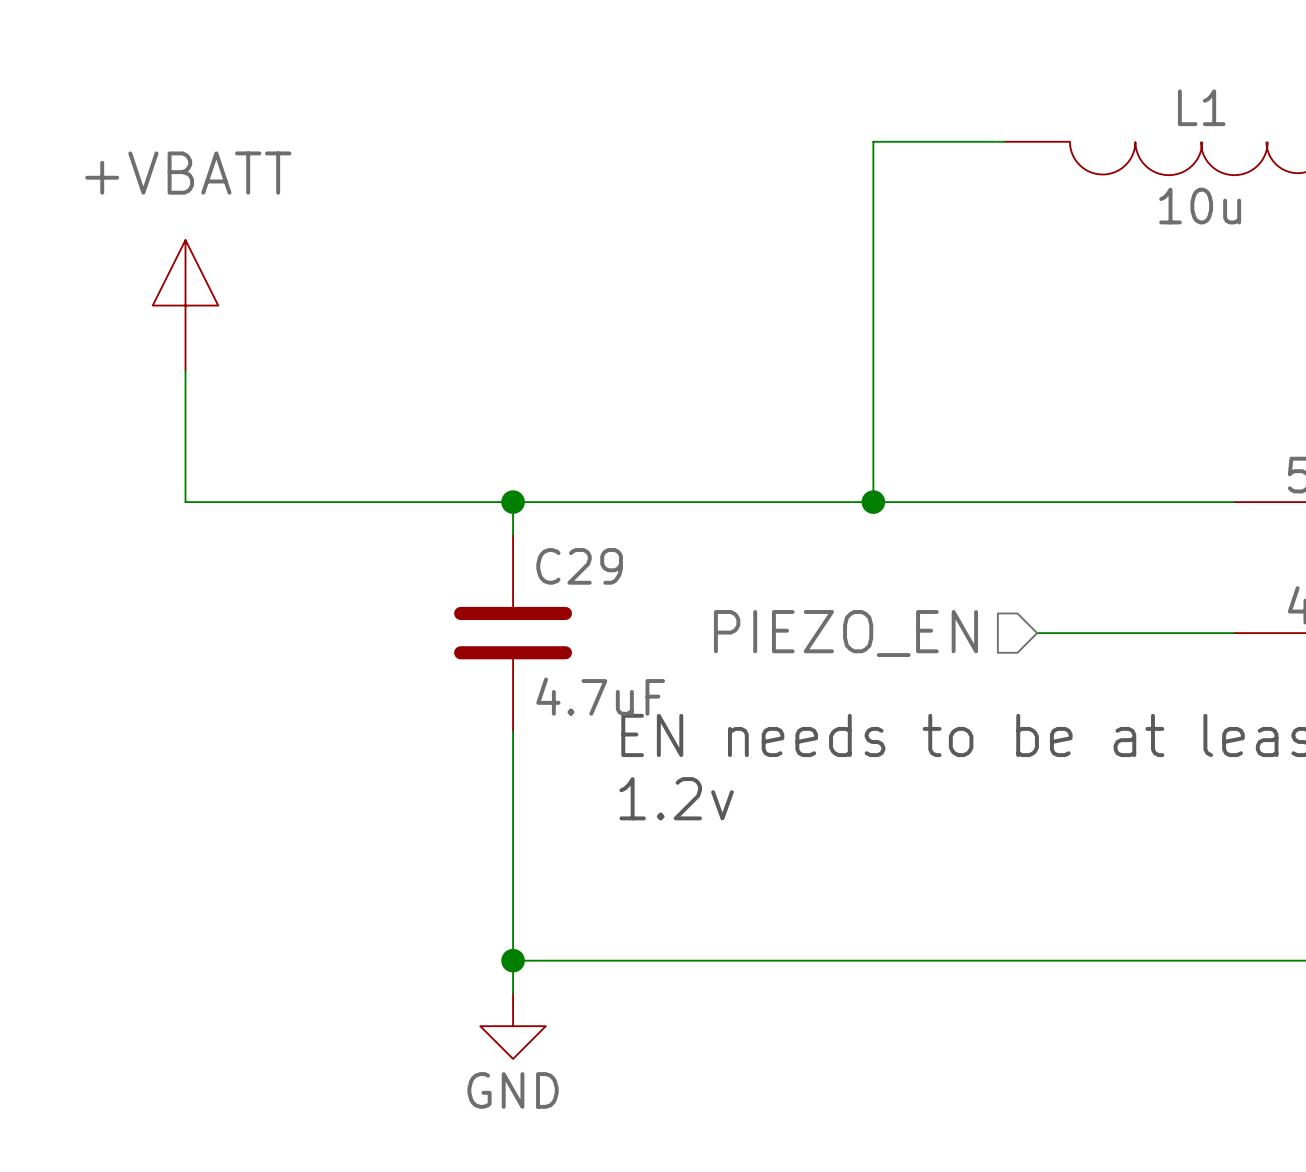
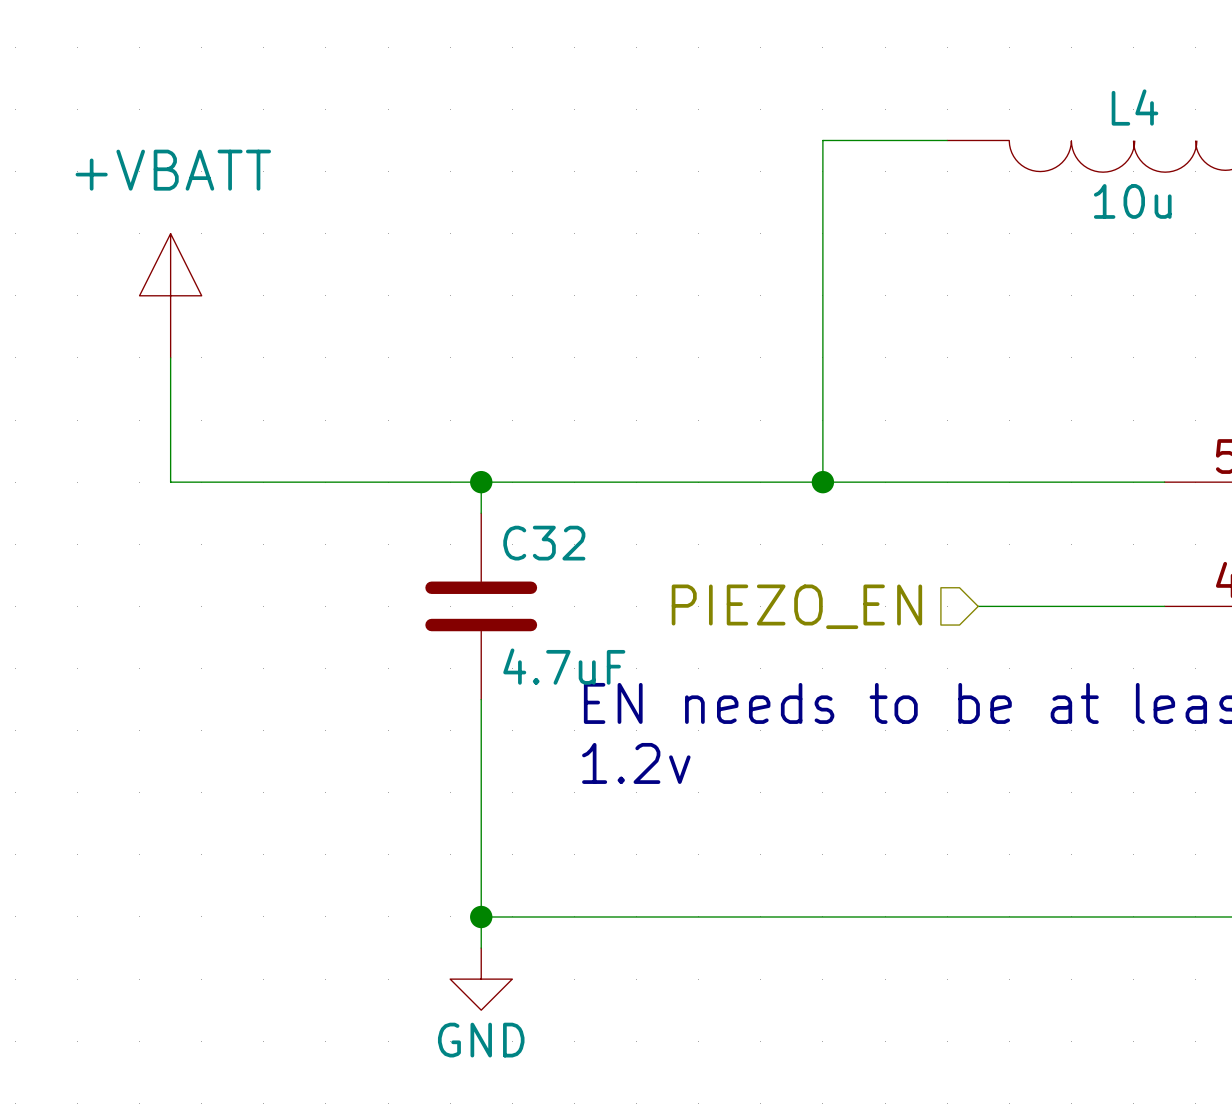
L1 name: L1 (1201, 107) -> L4 (1134, 107)
C29 name: C29 (579, 566) -> C32 (544, 543)

